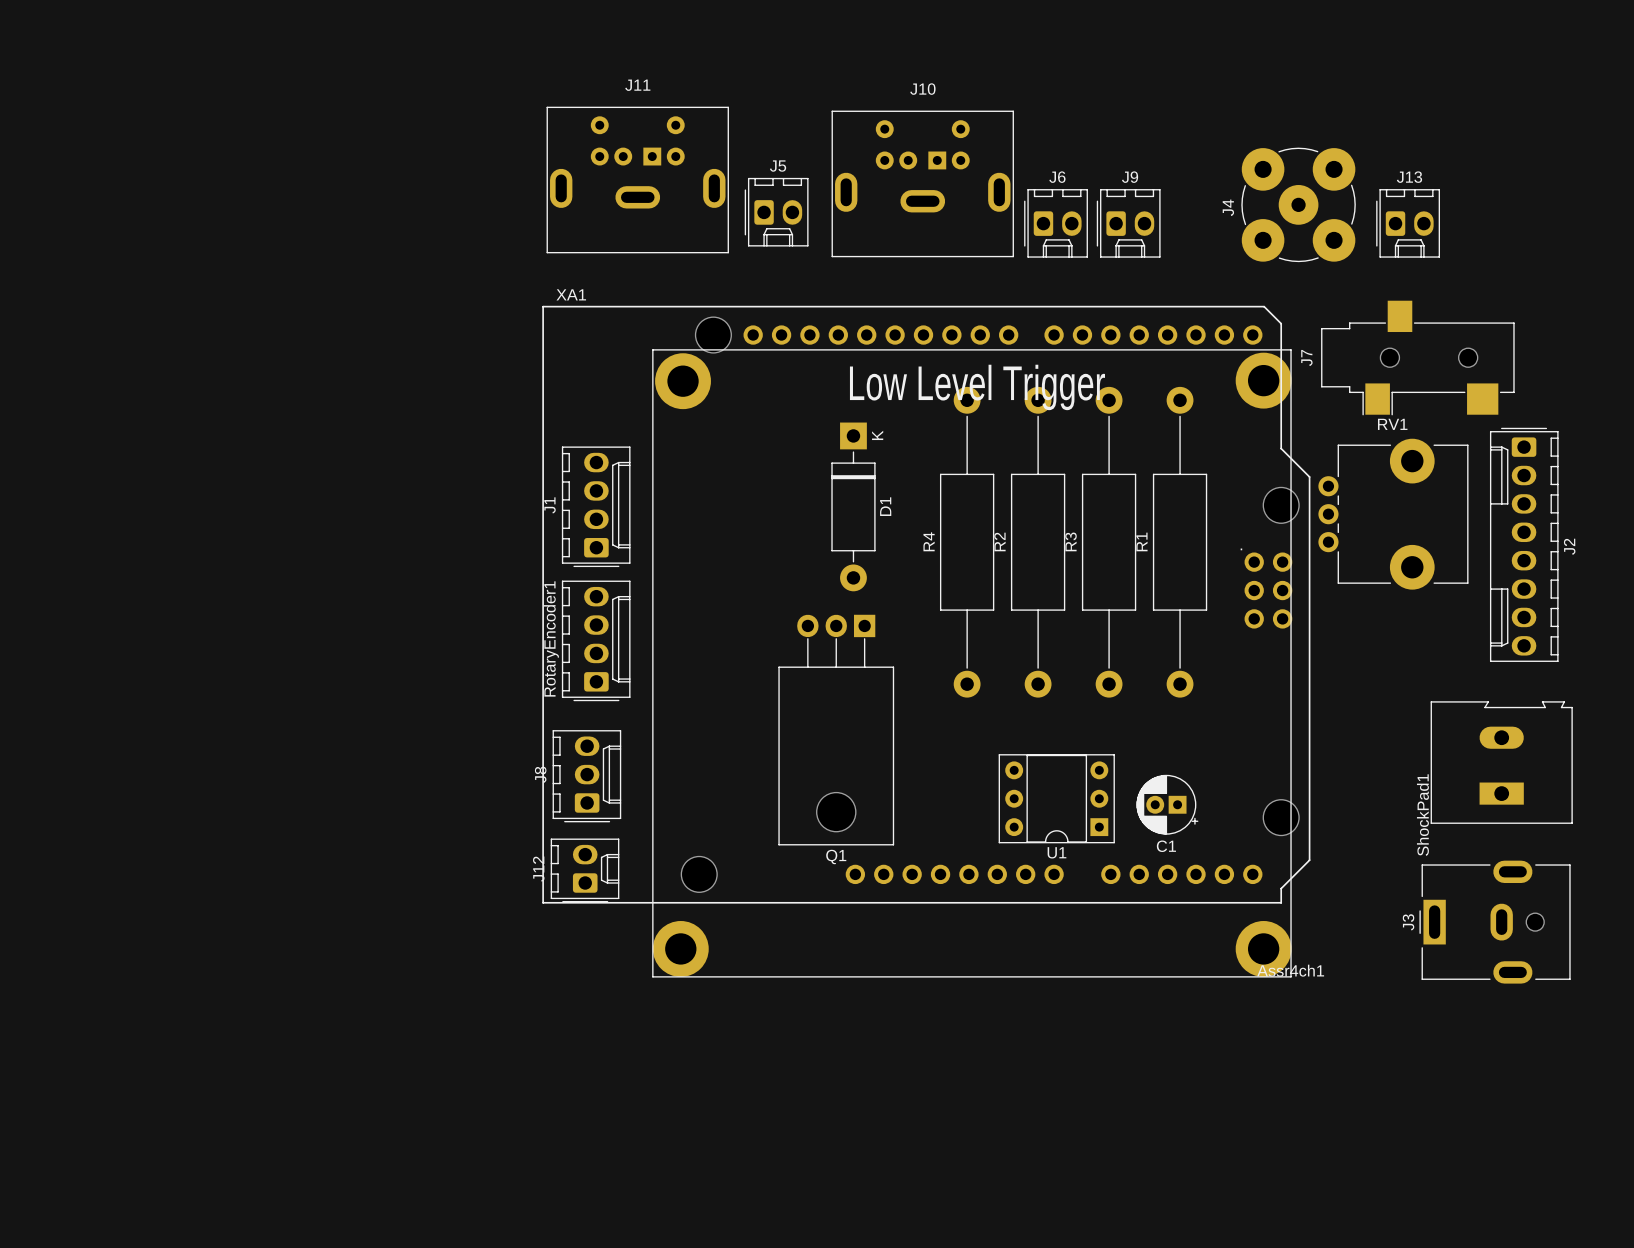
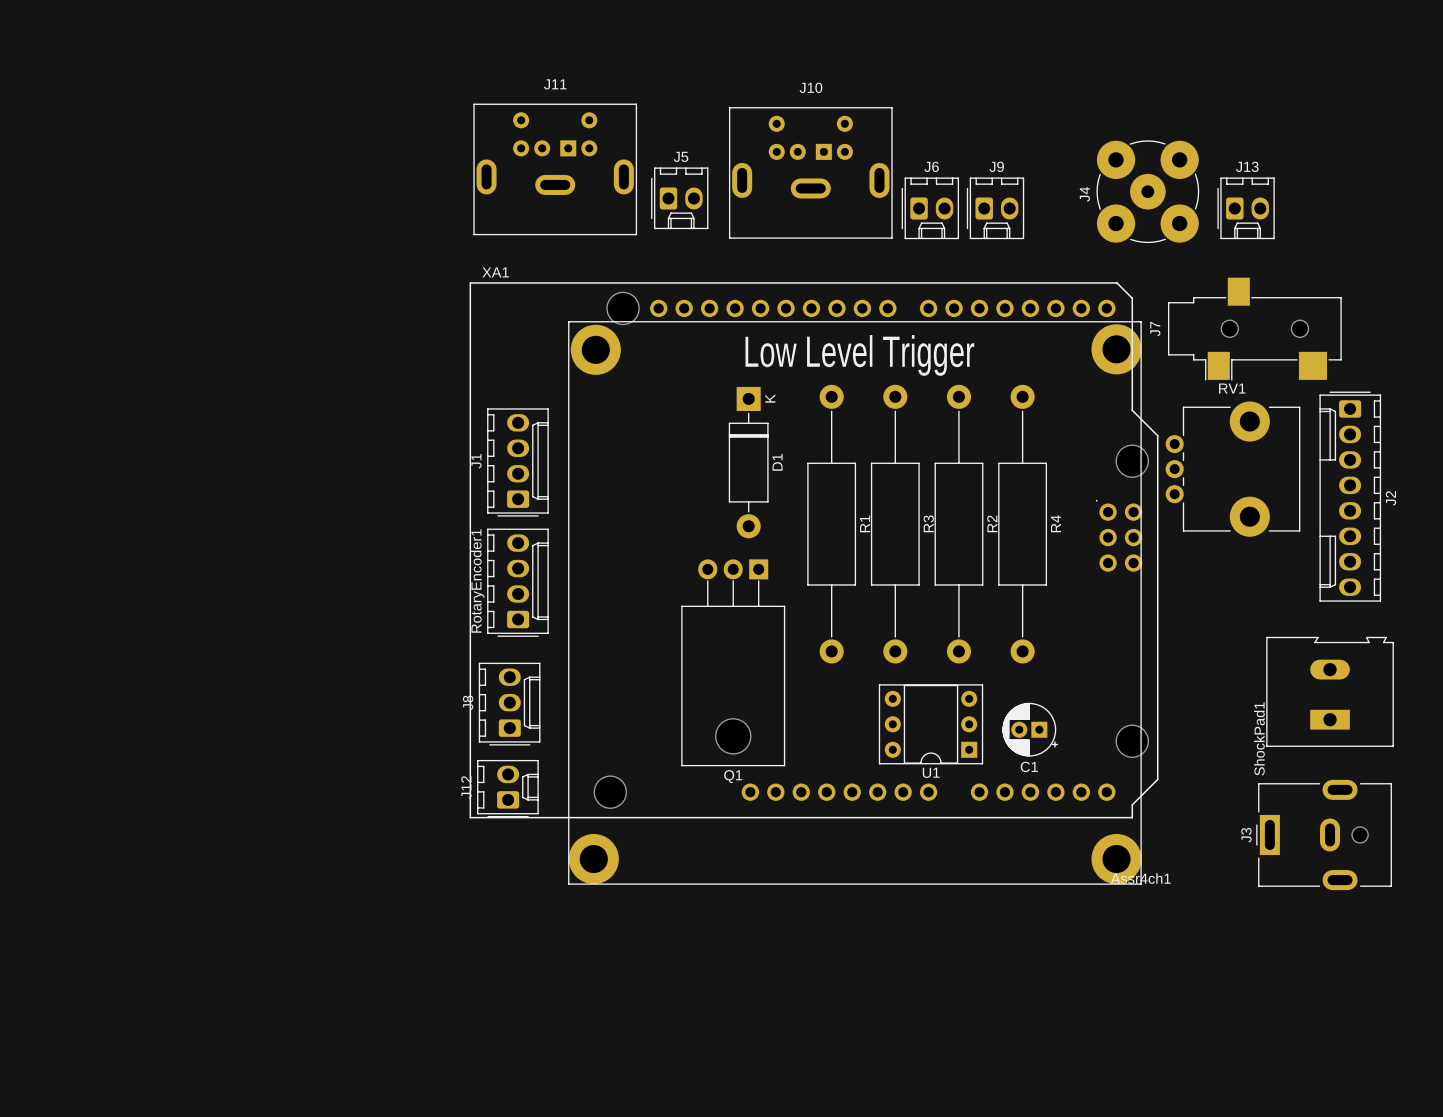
R4 name position: R4 (929, 541) -> R4 (1056, 523)
R2 name position: R2 (999, 541) -> R2 (992, 523)
R3 name position: R3 (1070, 541) -> R3 (928, 523)
R1 name position: R1 (1141, 541) -> R1 (865, 523)
R4 position: (967, 542) -> (1022, 524)
R2 position: (1038, 542) -> (958, 524)
R3 position: (1109, 542) -> (895, 524)
R1 position: (1180, 542) -> (831, 524)

